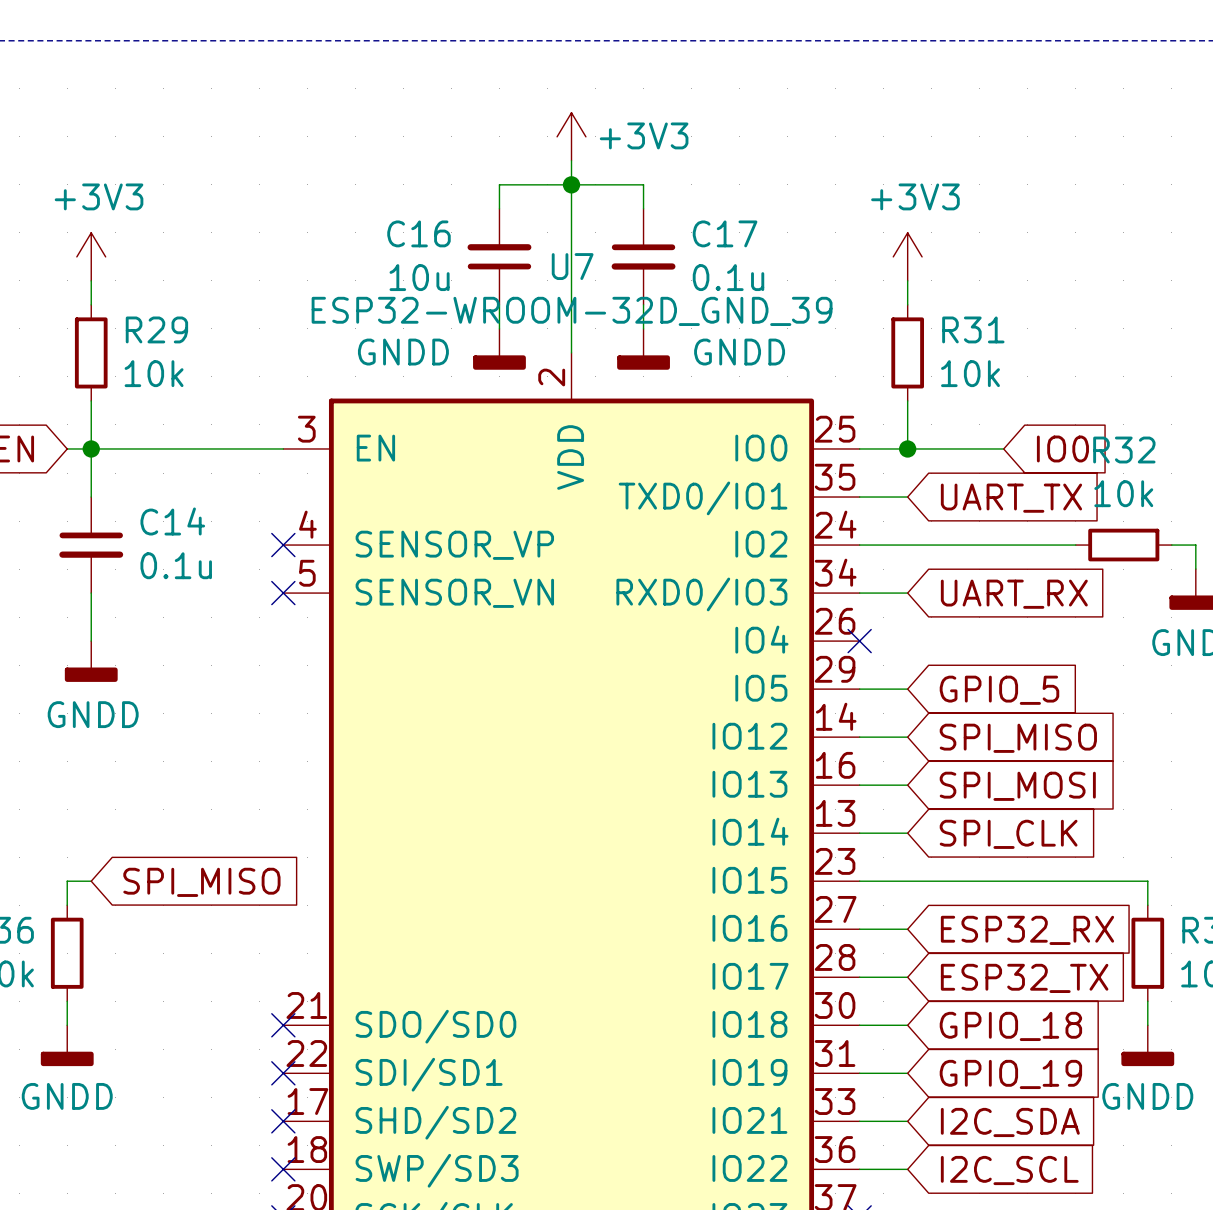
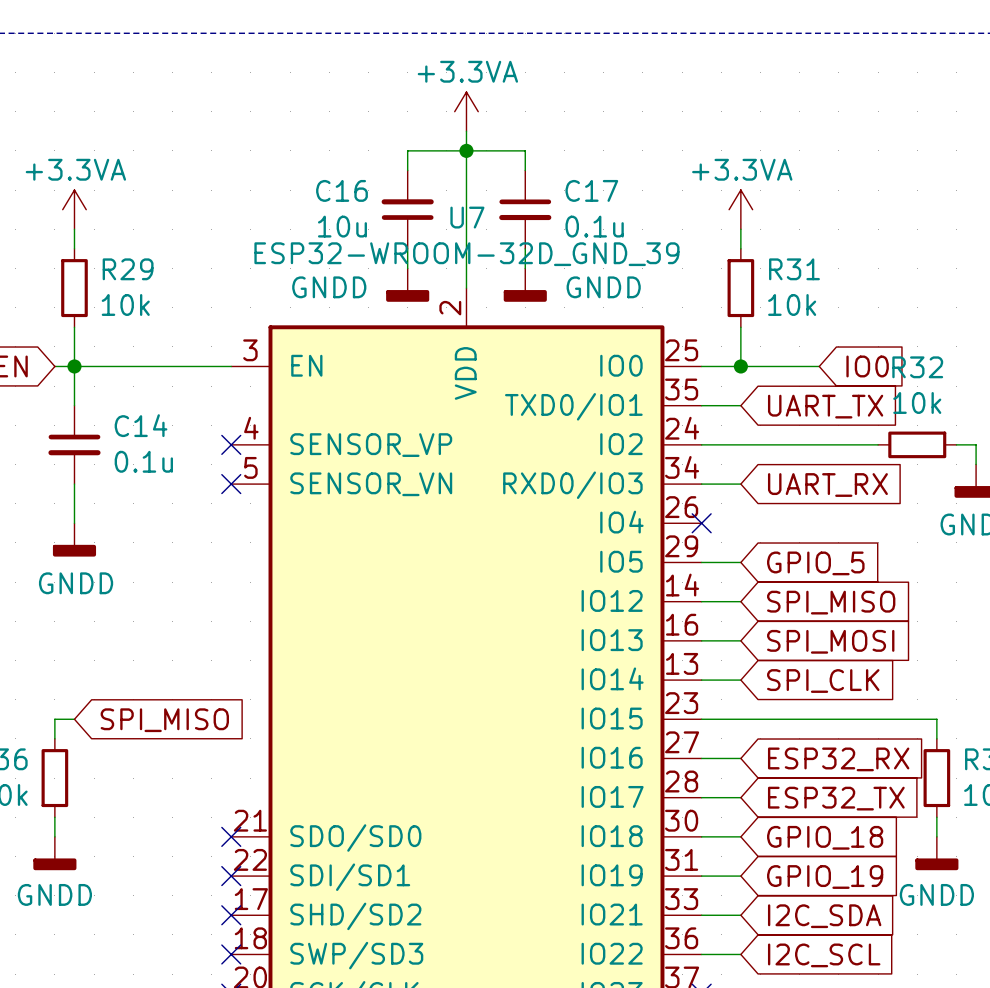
power symbol: +3V3 (571, 136) -> +3.3VA (466, 111)
power symbol: +3V3 (91, 256) -> +3.3VA (74, 209)
power symbol: +3V3 (907, 256) -> +3.3VA (740, 209)

